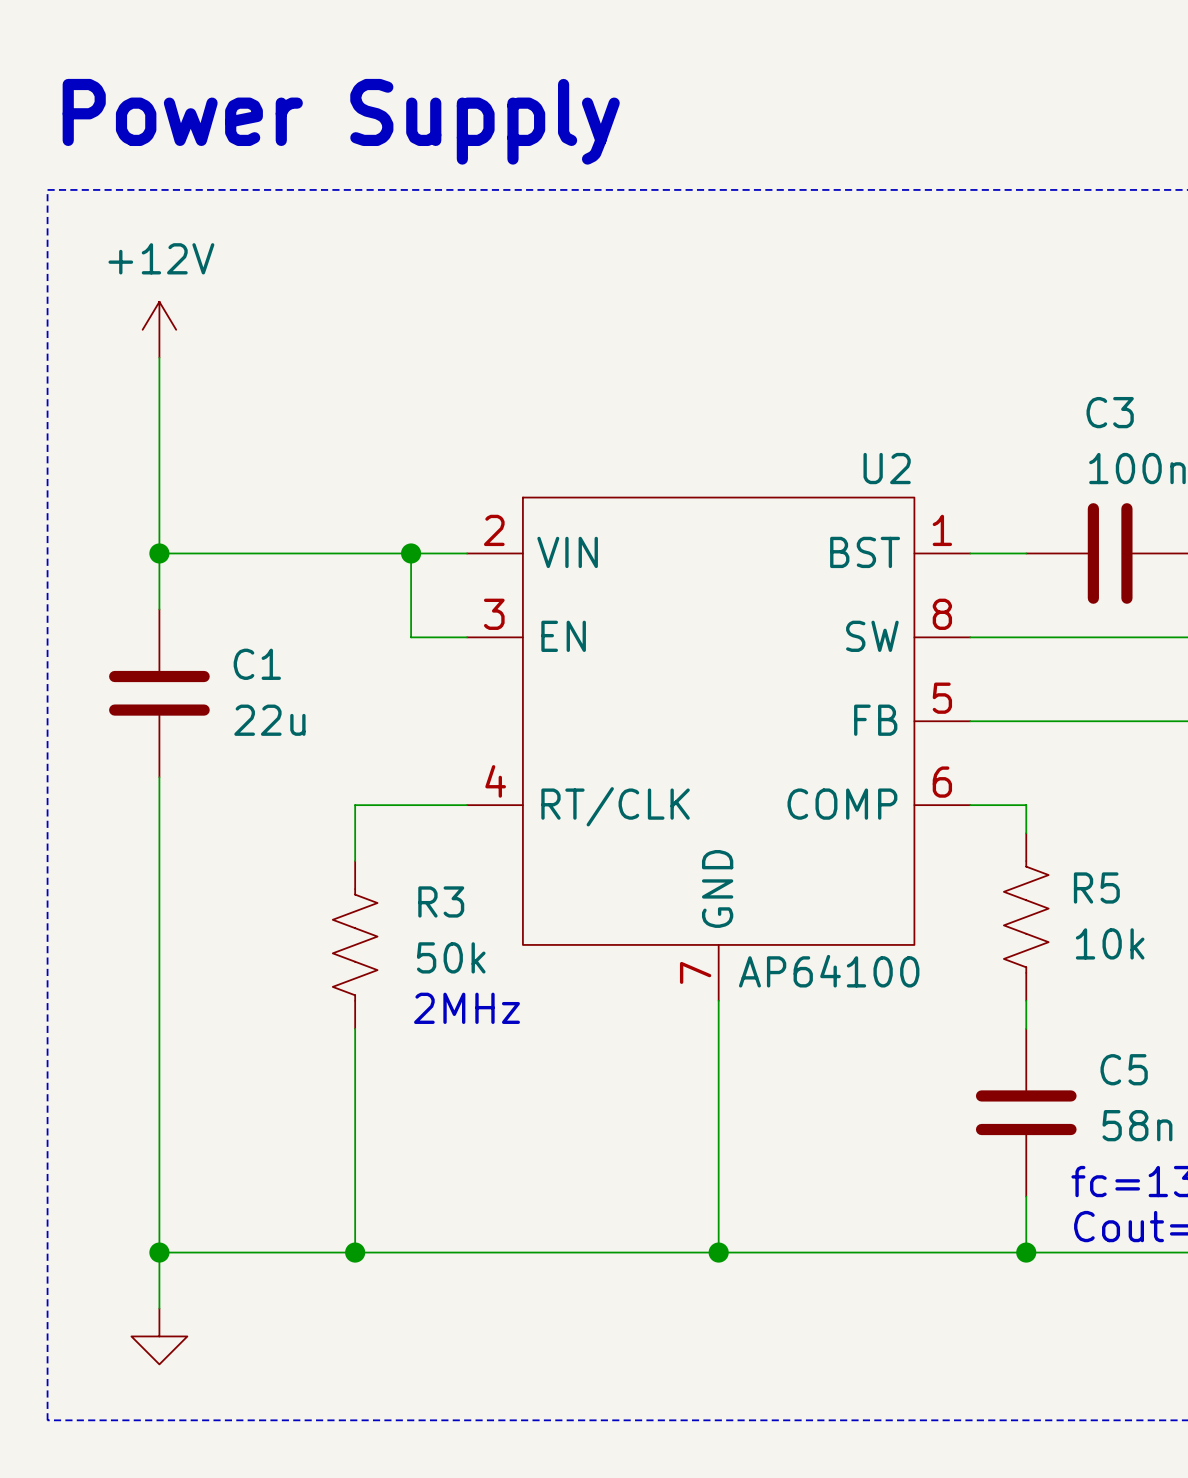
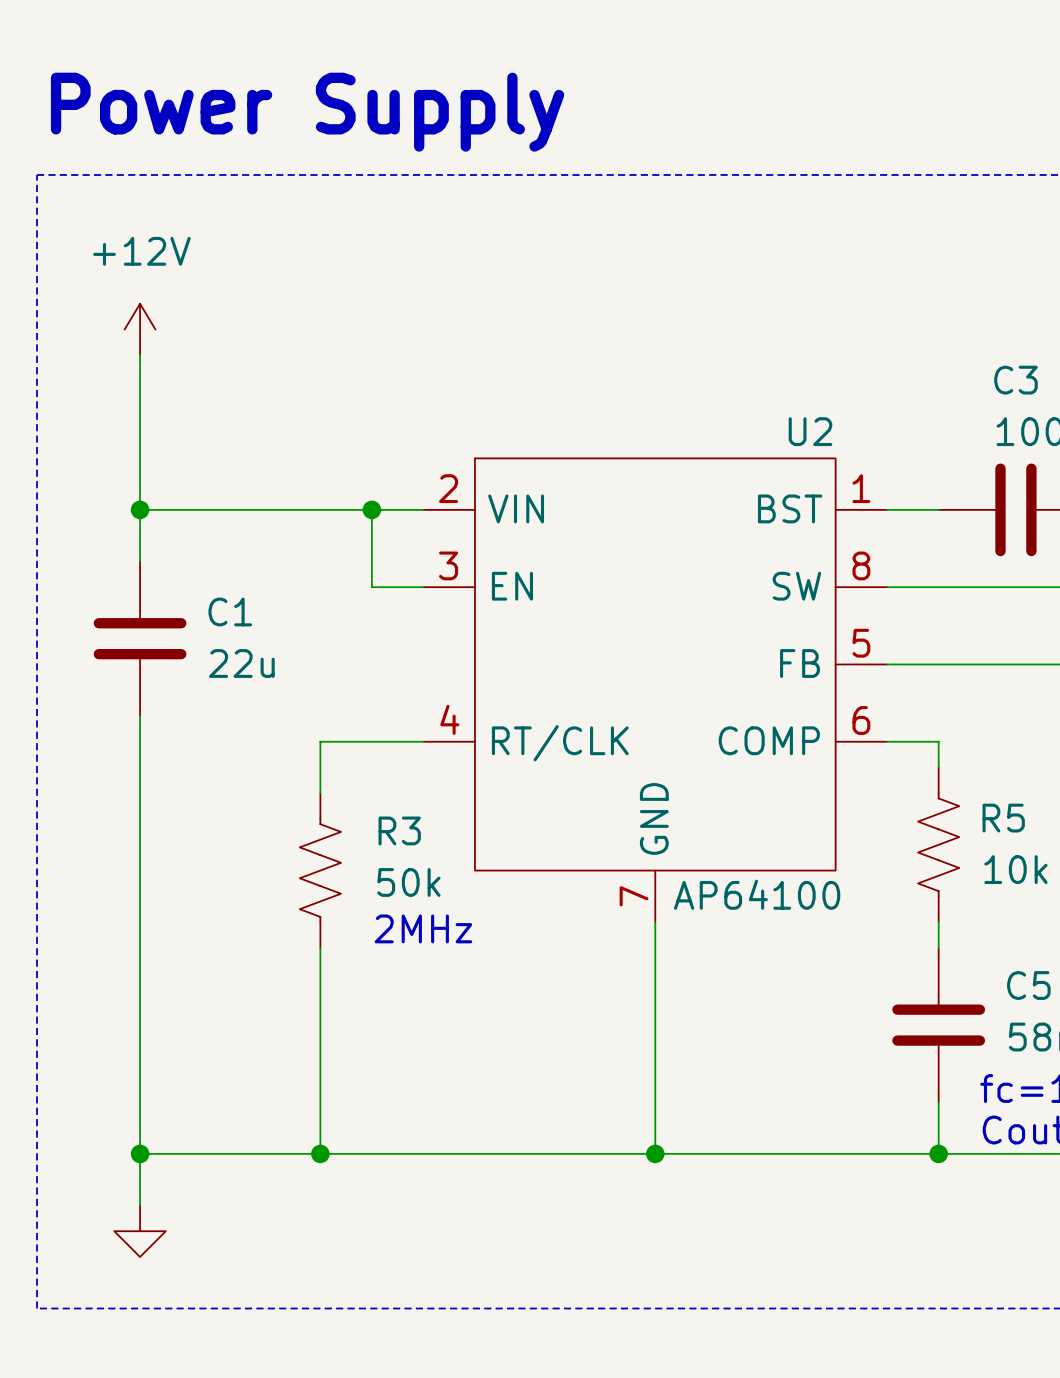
power symbol text position: +12V (161, 258) -> +12V (141, 251)
power symbol position: +12V (159, 329) -> +12V (140, 329)

